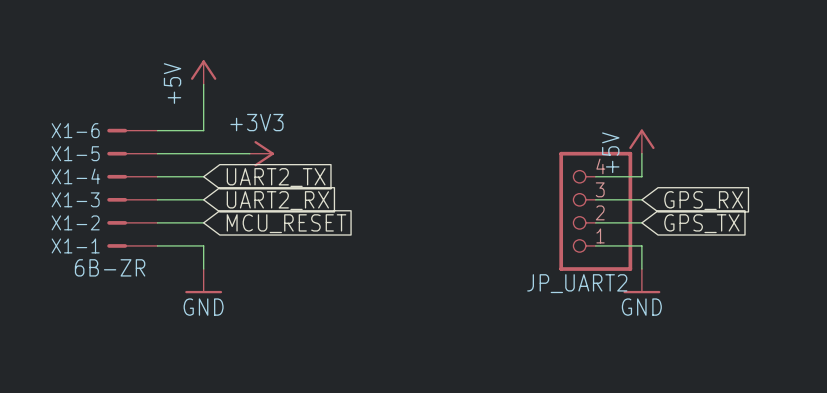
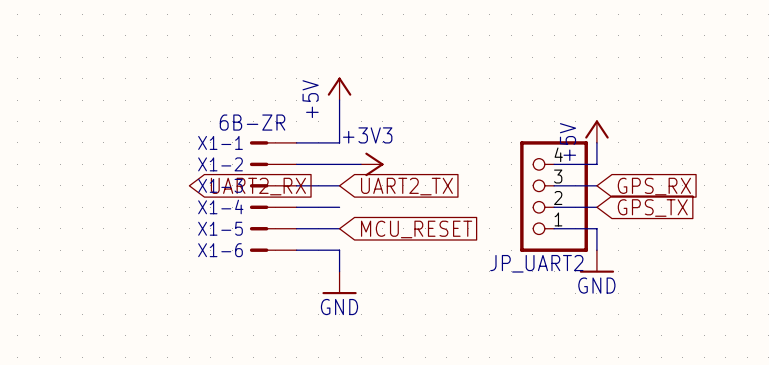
power symbol position: +5V (203, 72) -> +5V (339, 88)
wire: (203, 84) (203, 130) (157, 130) -> (339, 100) (339, 142) (296, 142)
X1-6 position: (132, 130) -> (273, 250)
X1-5 position: (132, 153) -> (273, 228)
wire: (157, 153) (249, 153) -> none
power symbol position: +3V3 (261, 153) -> +3V3 (372, 164)
X1-4 position: (132, 176) -> (273, 207)
wire: (157, 176) (203, 176) -> (296, 185) (339, 185)
wire: none -> (296, 164) (361, 164)
global label position: UART2_TX (276, 177) -> UART2_TX (406, 186)
X1-3 position: (132, 199) -> (273, 185)
wire: (157, 199) (203, 199) -> (296, 207) (339, 207)
X1-2 position: (132, 222) -> (273, 164)
wire: (157, 222) (203, 222) -> (296, 228) (339, 228)
global label position: MCU_RESET (286, 223) -> MCU_RESET (416, 229)
X1-1 position: (132, 245) -> (273, 142)
wire: (157, 245) (203, 245) (203, 269) -> (296, 250) (339, 250) (339, 271)
X1-1 value position: 6B-ZR (110, 267) -> 6B-ZR (252, 122)
power symbol position: GND (203, 281) -> GND (339, 282)

